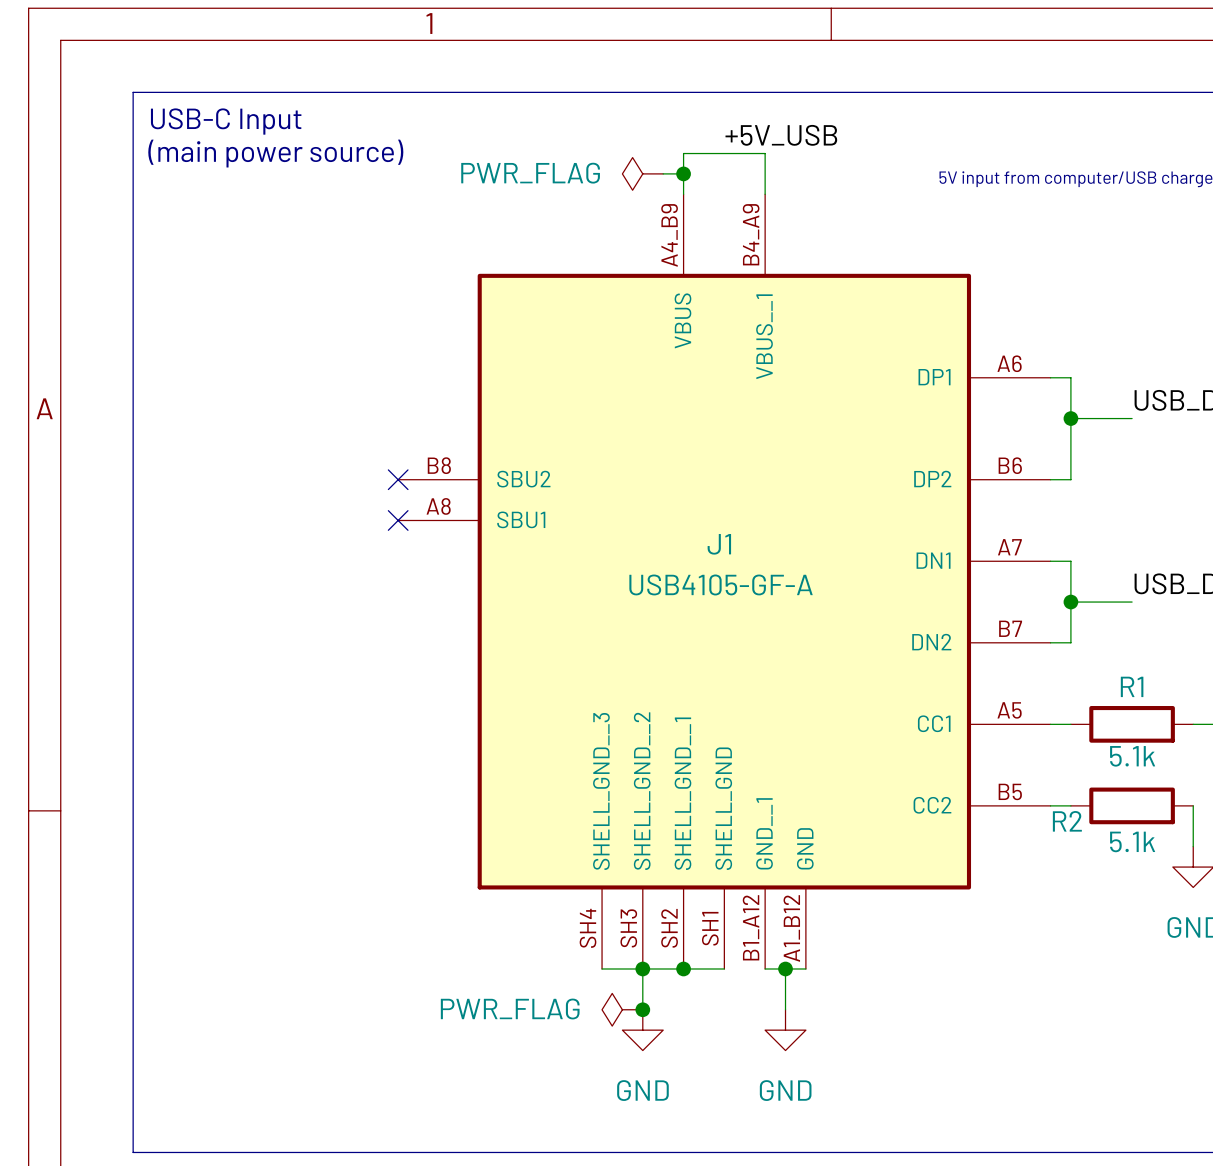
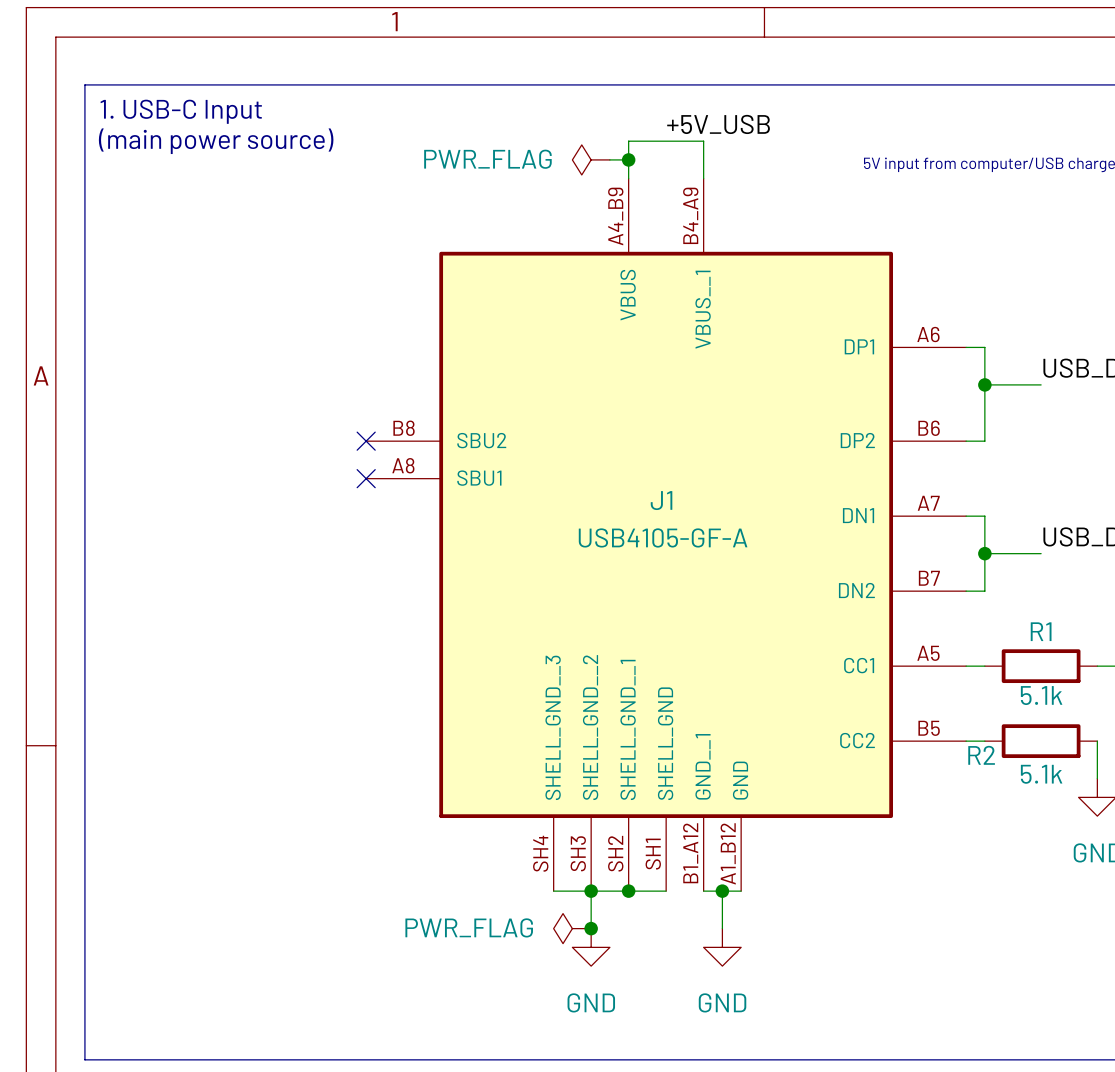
line: (133, 92) (133, 1152) -> (122, 84) (84, 84) (84, 1059) (122, 1059)
text: USB-C Input (226, 121) -> 1. USB-C Input (181, 111)
text position: (main power source) (275, 153) -> (main power source) (216, 141)

